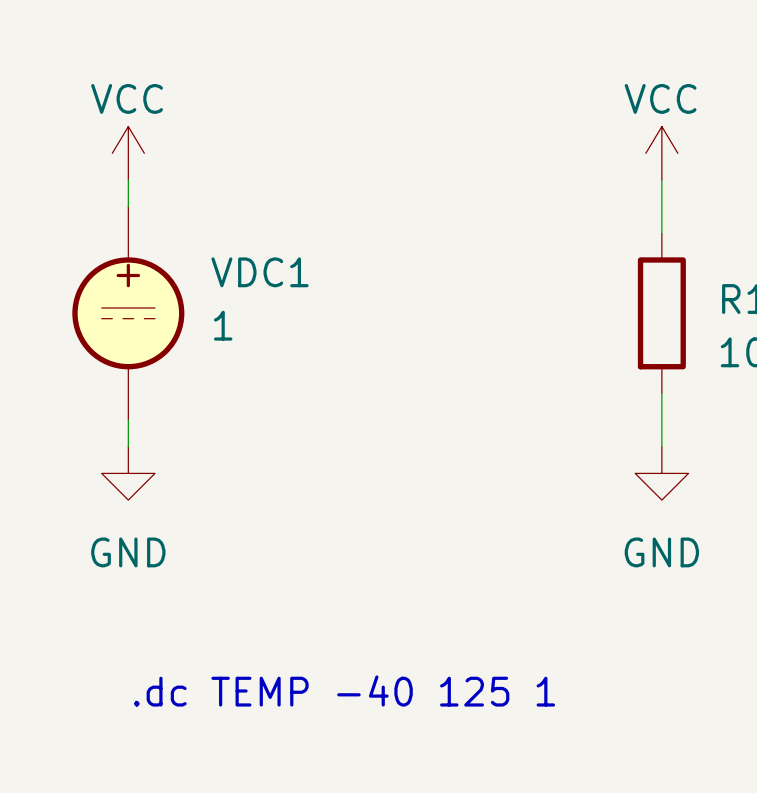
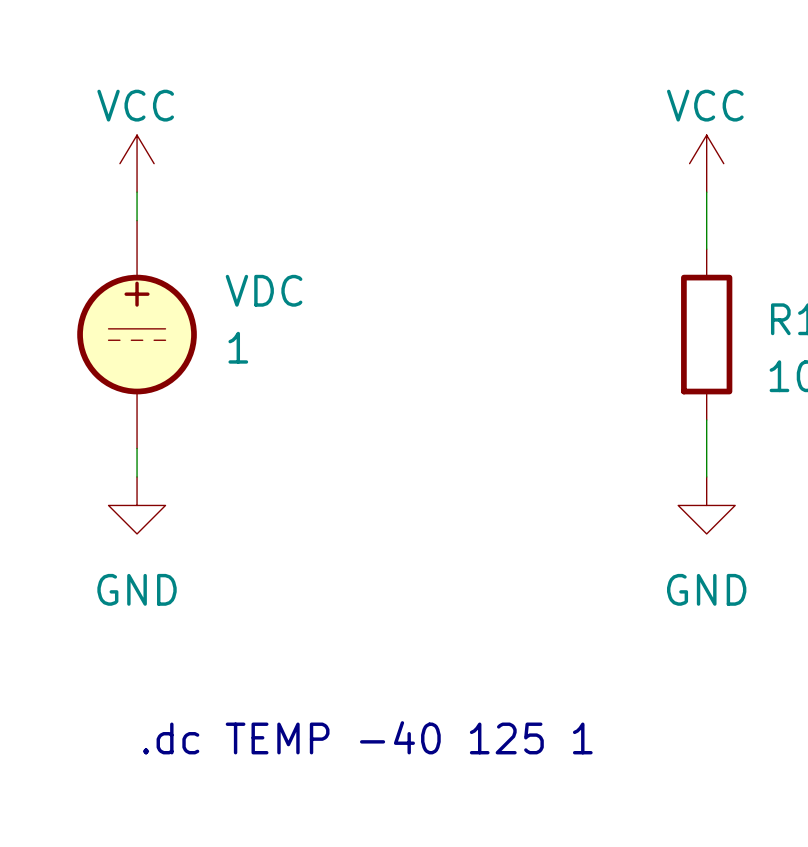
VDC1 name: VDC1 (260, 272) -> VDC (264, 290)

